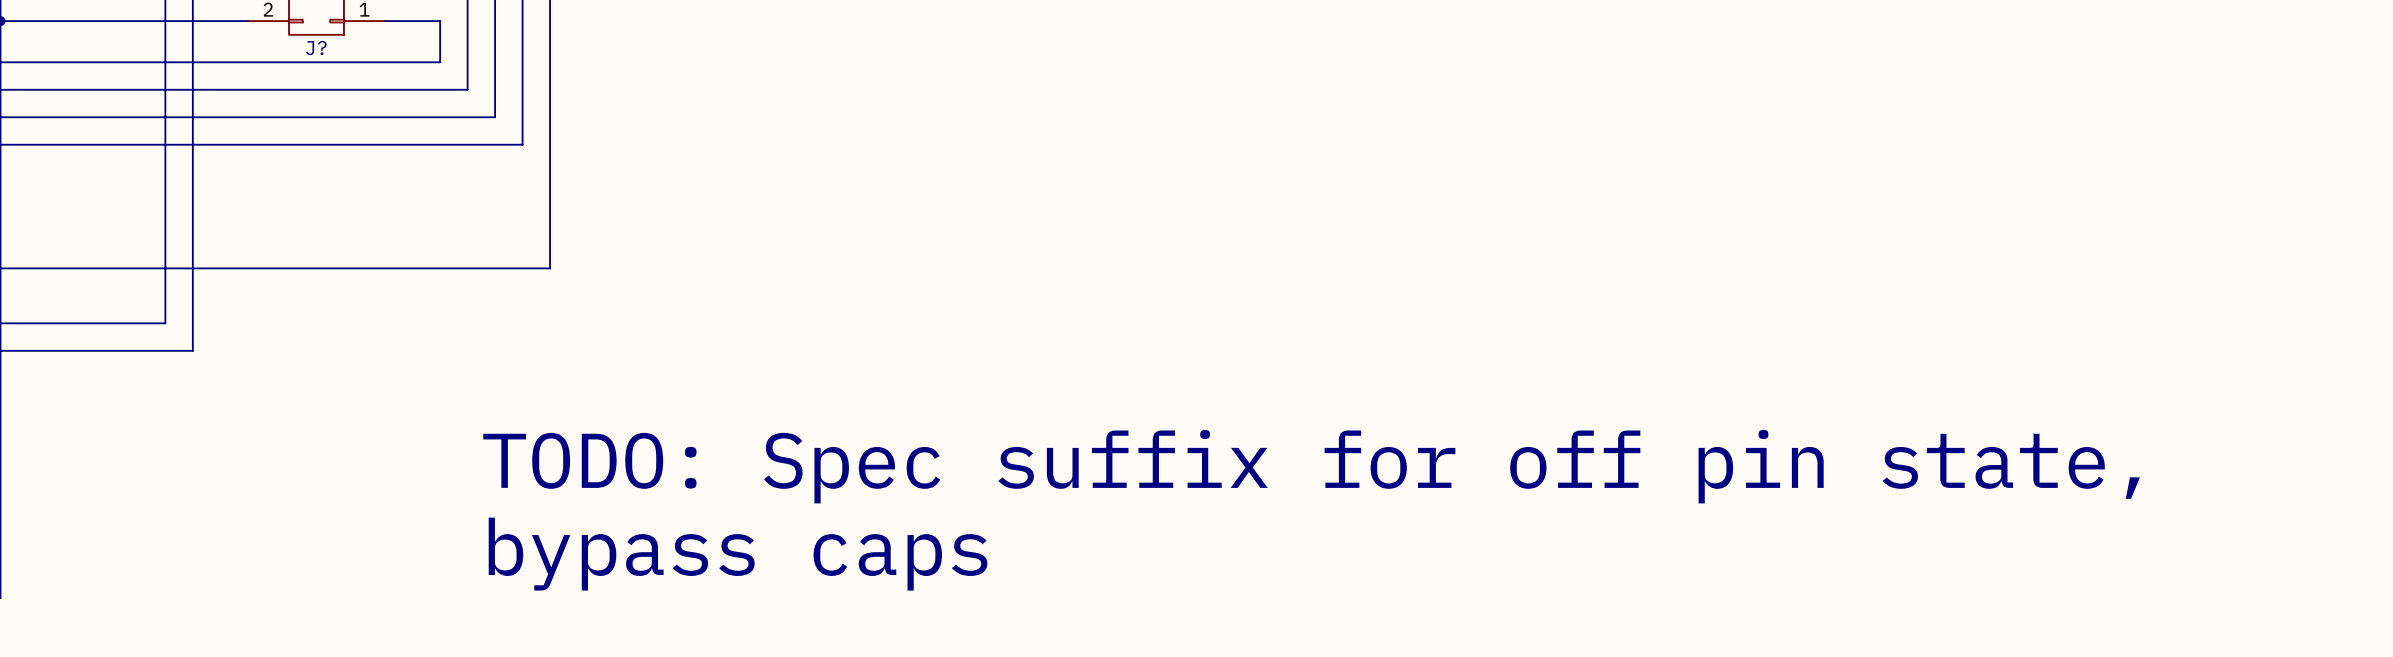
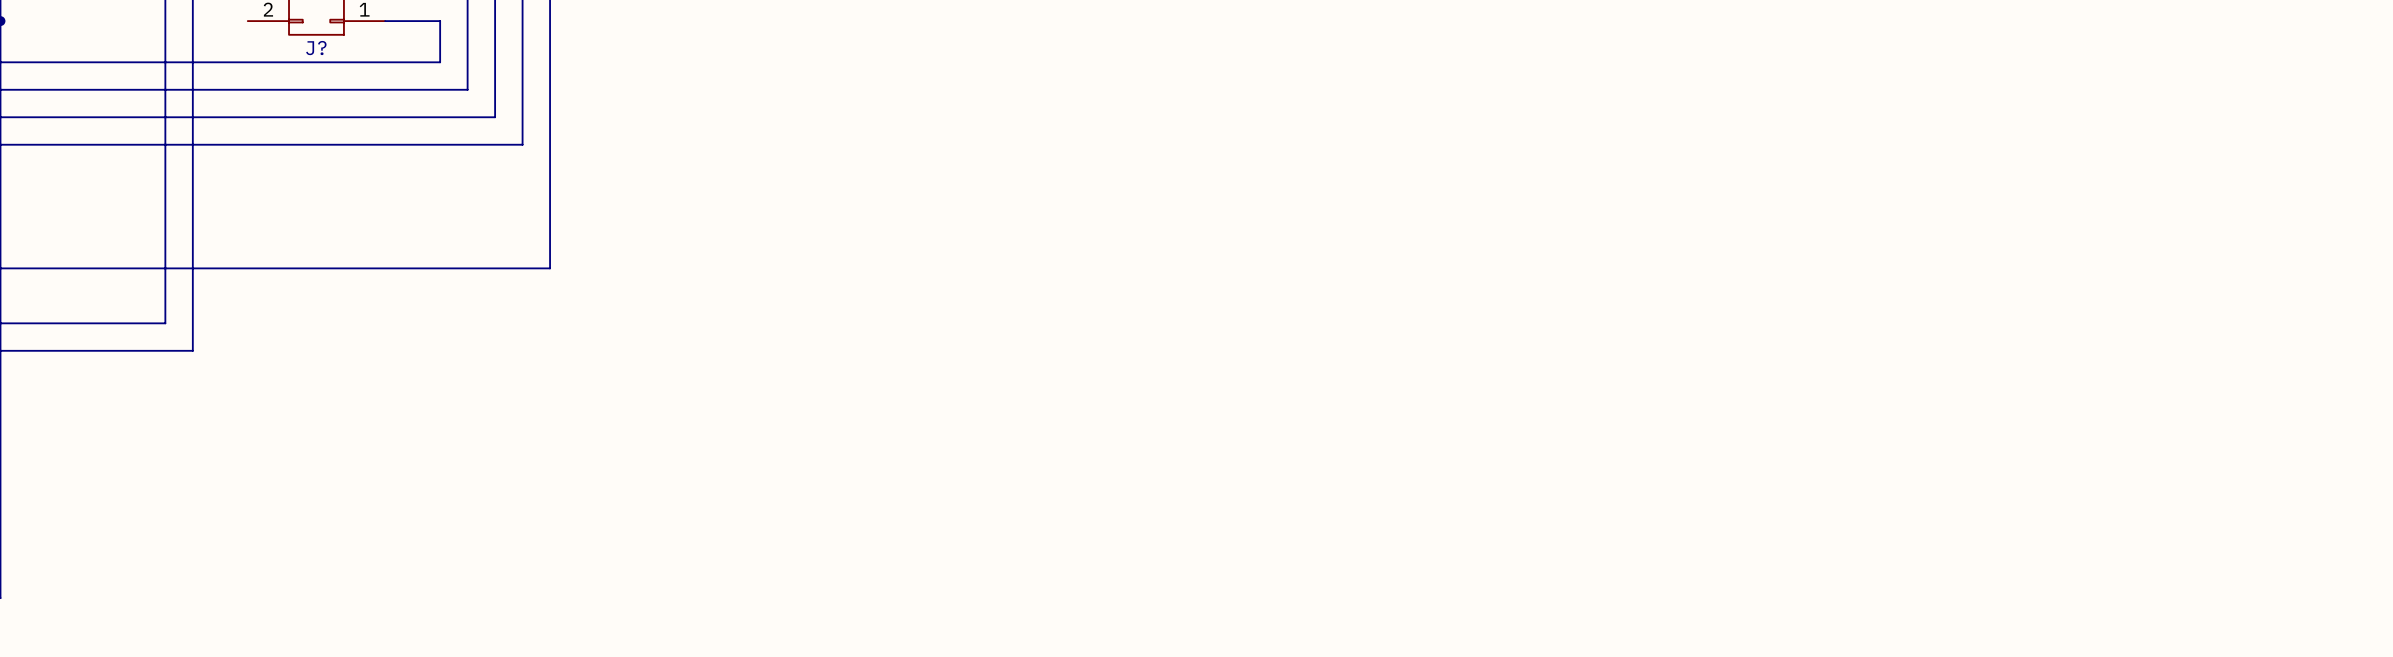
wire: (0, 21) (247, 21) -> none
text: TODO: Spec suffix for off pin state, (1311, 466) -> none
text: bypass caps (738, 554) -> none

